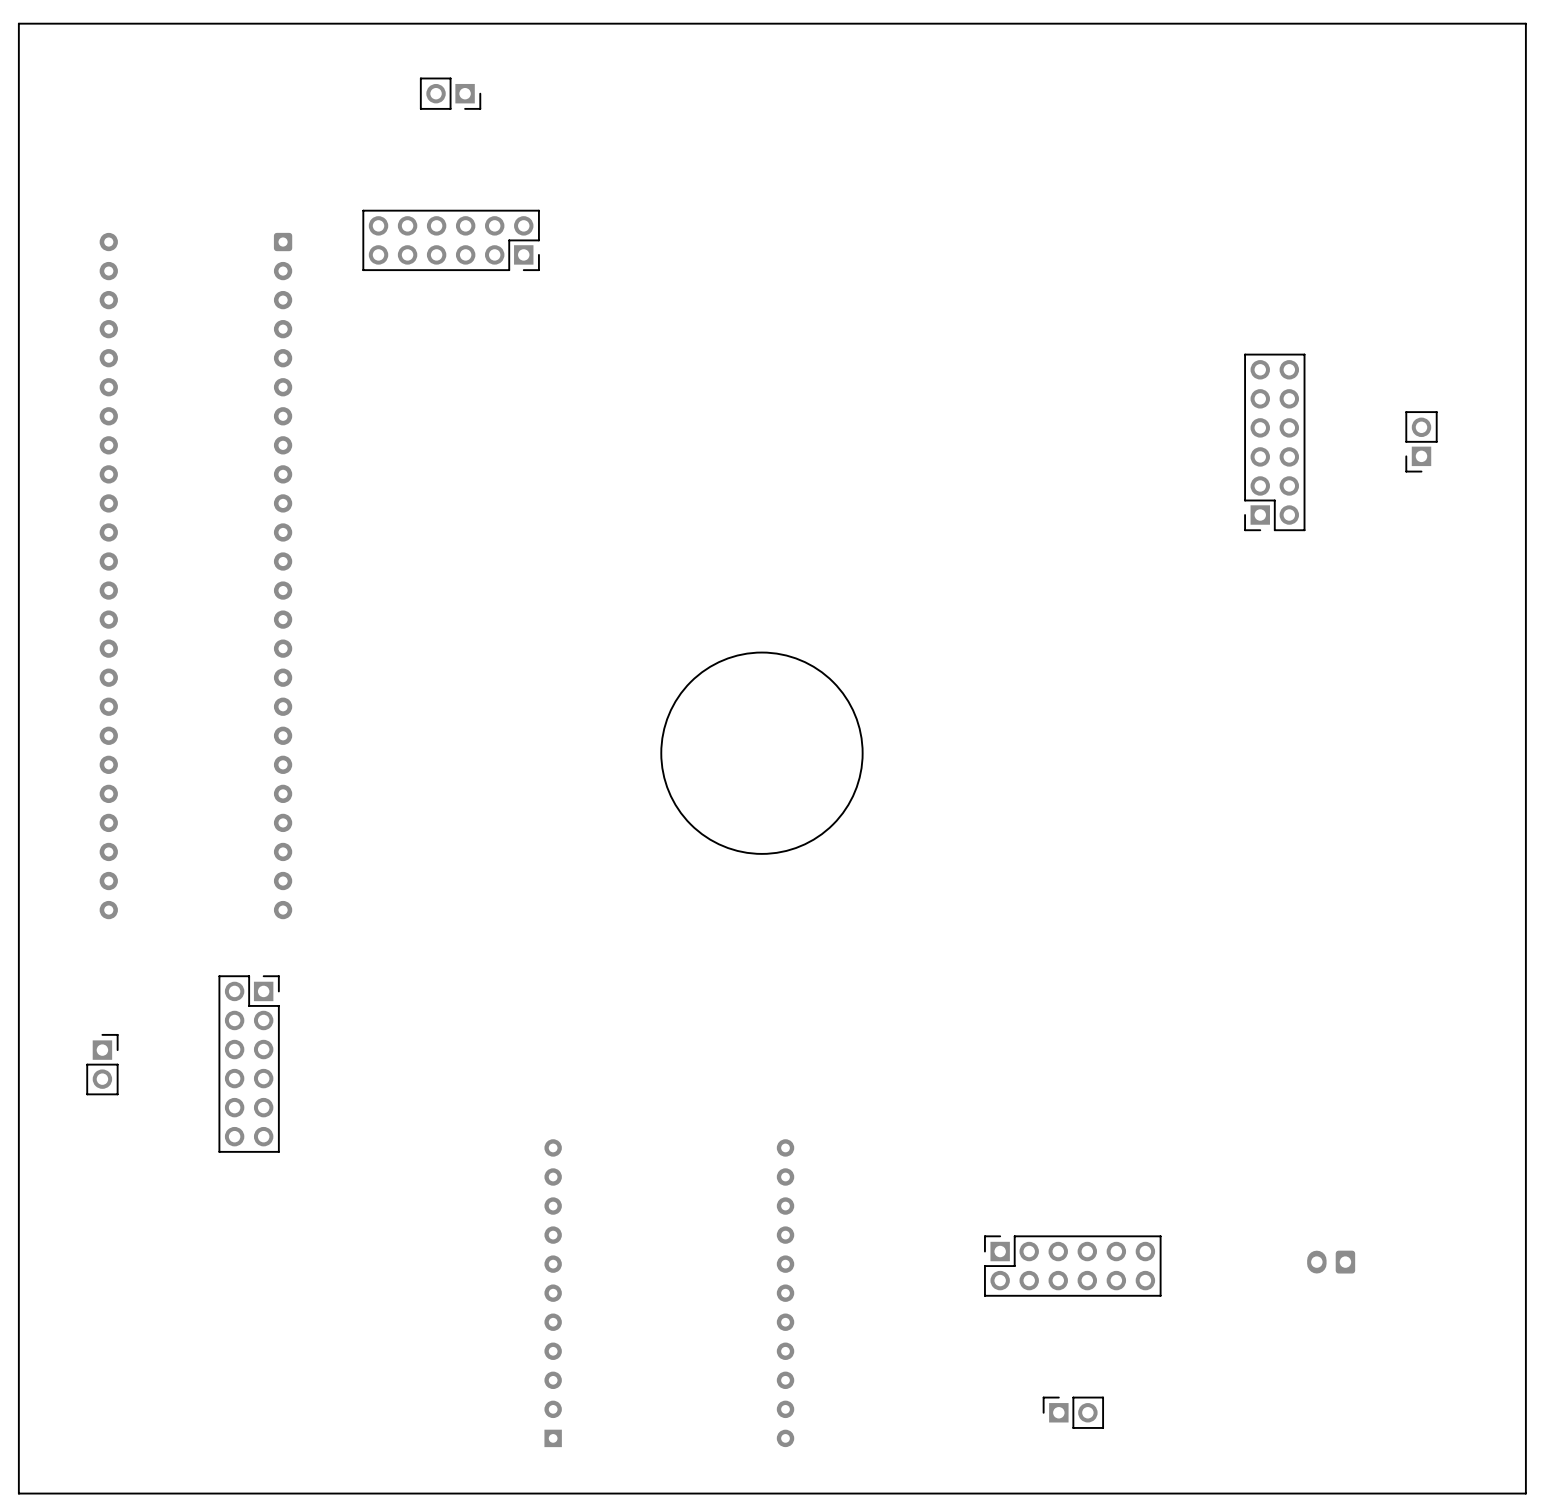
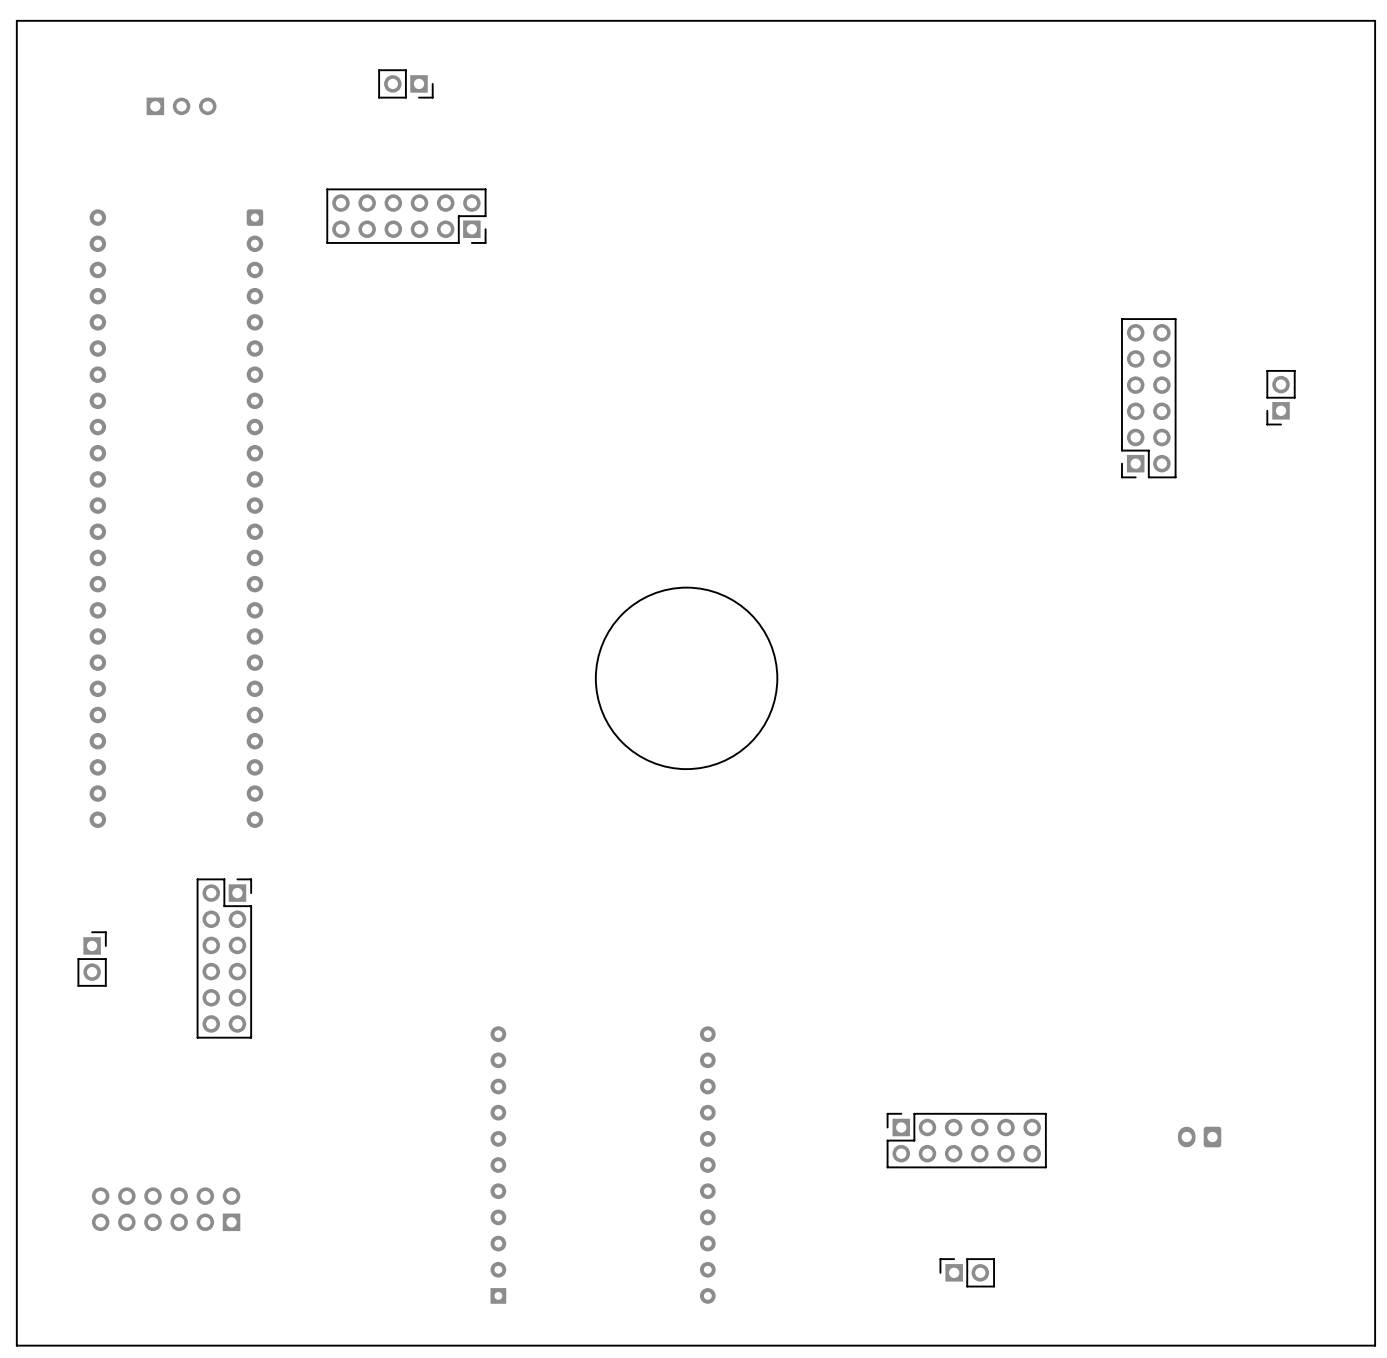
part: none -> (181, 106)
part: none -> (166, 1209)

